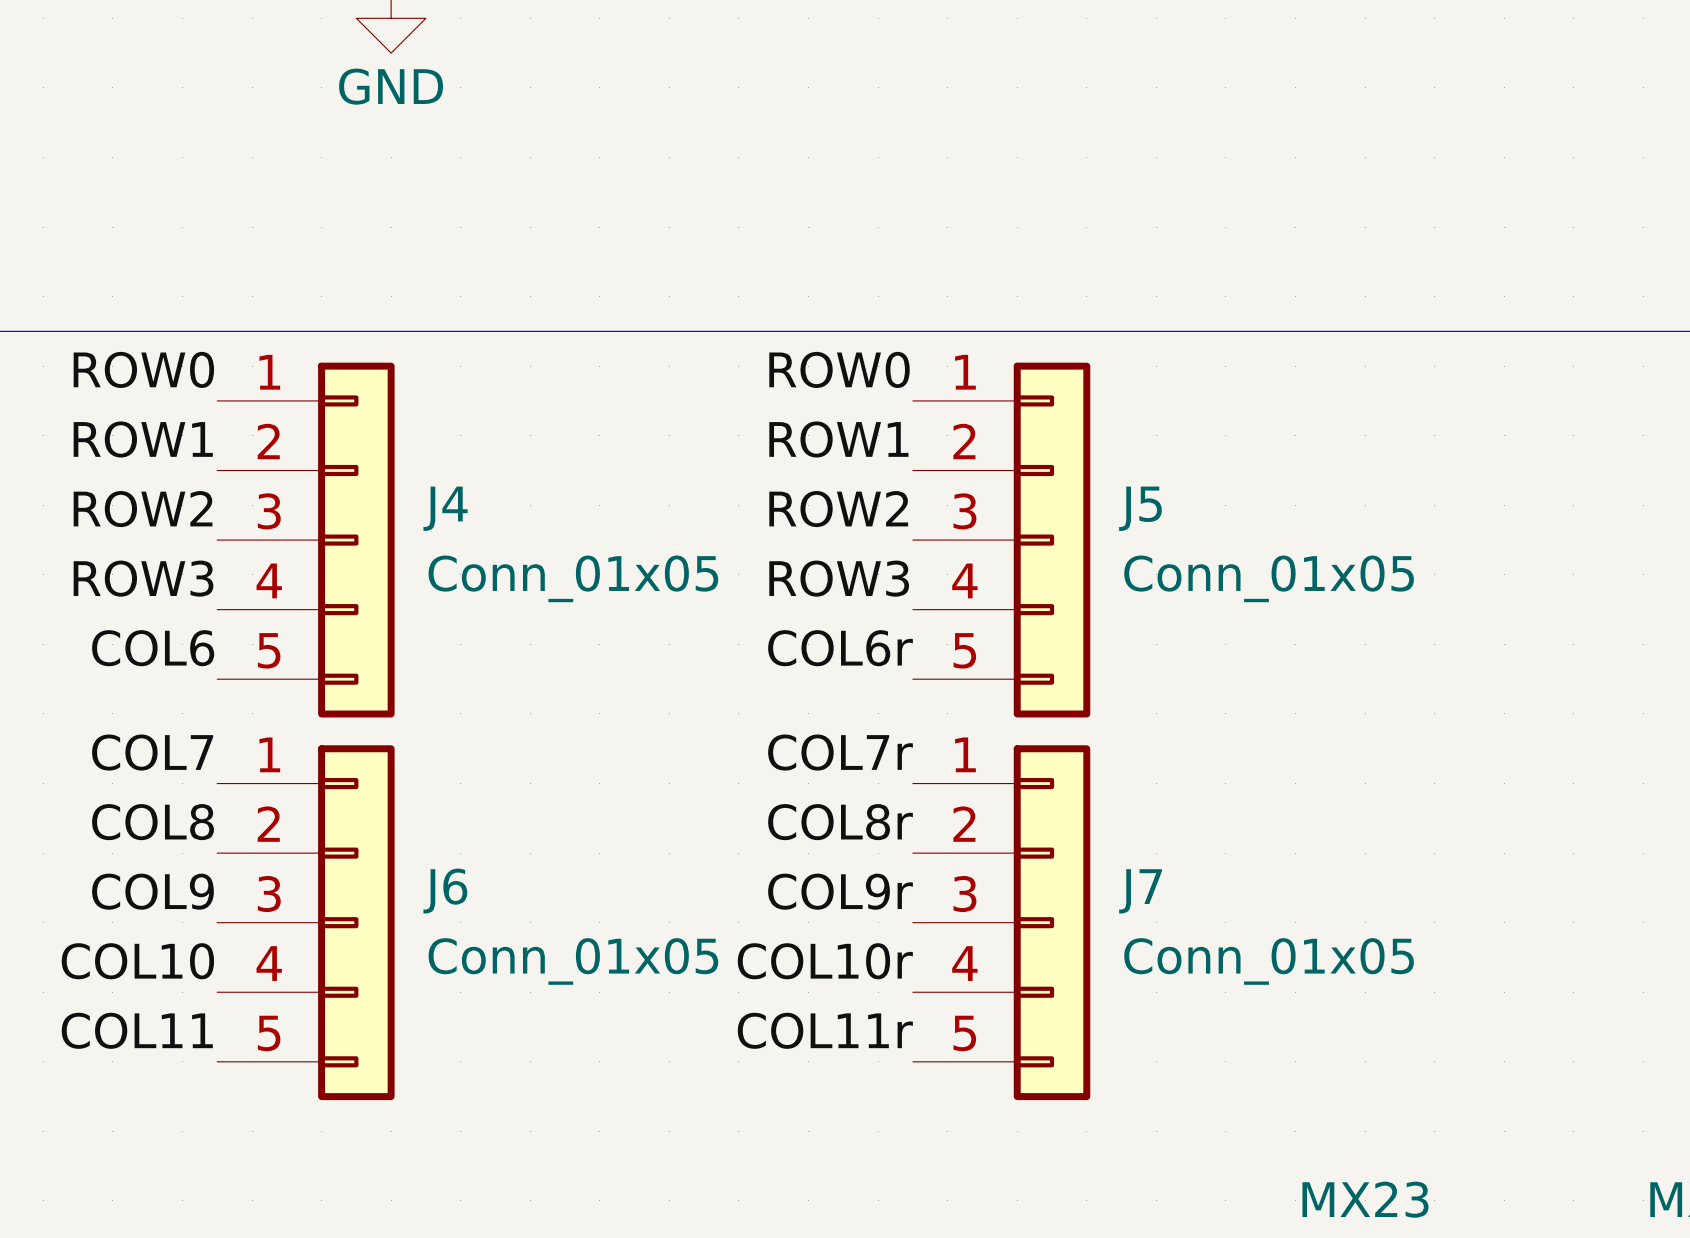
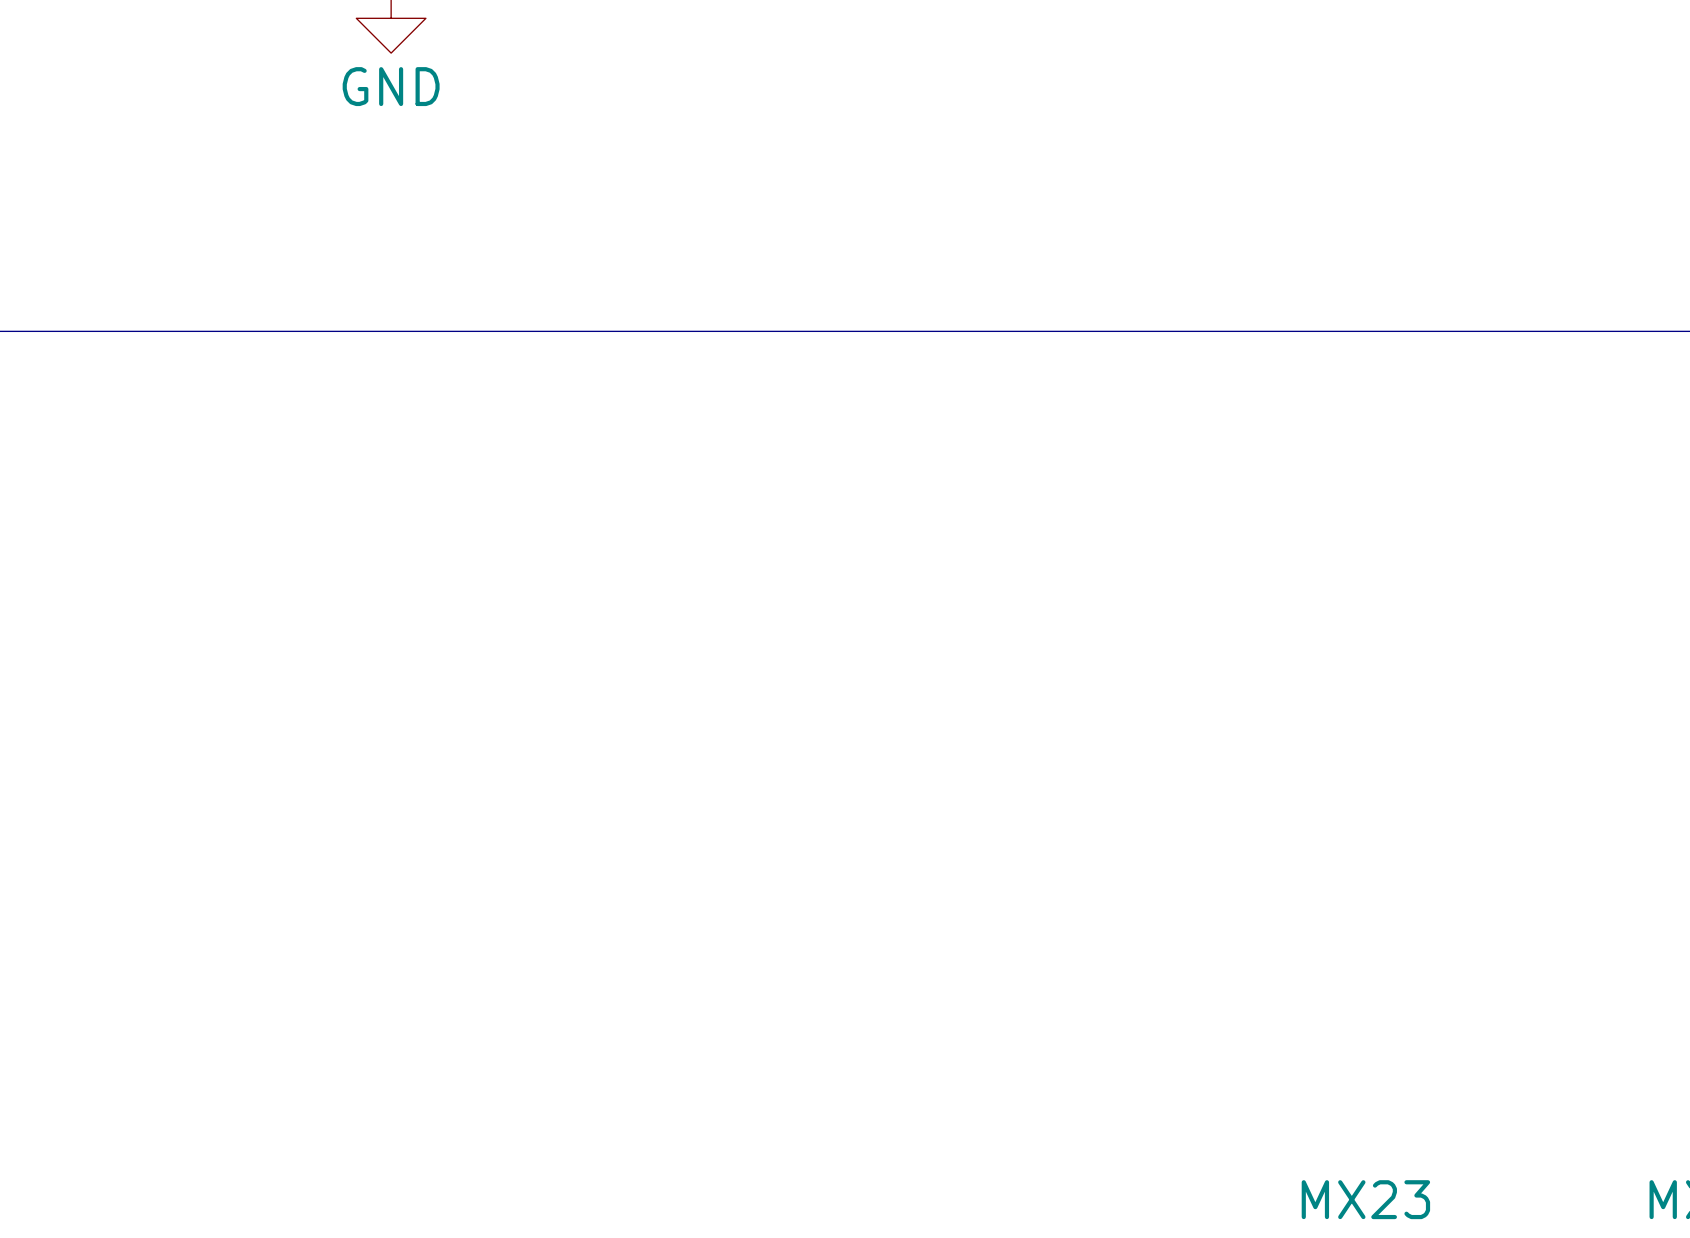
label: ROW0 (143, 369) -> none
label: ROW0 (839, 369) -> none
label: ROW1 (143, 439) -> none
label: ROW1 (838, 439) -> none
label: ROW2 (143, 509) -> none
label: ROW2 (838, 509) -> none
J4: Conn_01x05 (305, 540) -> none
J5: Conn_01x05 (1001, 540) -> none
label: ROW3 (143, 578) -> none
label: ROW3 (839, 578) -> none
label: COL6 (153, 648) -> none
label: COL6r (840, 648) -> none
label: COL7 (152, 752) -> none
label: COL7r (840, 752) -> none
label: COL8 (153, 822) -> none
label: COL8r (840, 822) -> none
label: COL9 (152, 891) -> none
label: COL9r (840, 891) -> none
J6: Conn_01x05 (305, 922) -> none
J7: Conn_01x05 (1001, 922) -> none
label: COL10 (137, 961) -> none
label: COL10r (825, 961) -> none
label: COL11 (137, 1030) -> none
label: COL11r (825, 1030) -> none

